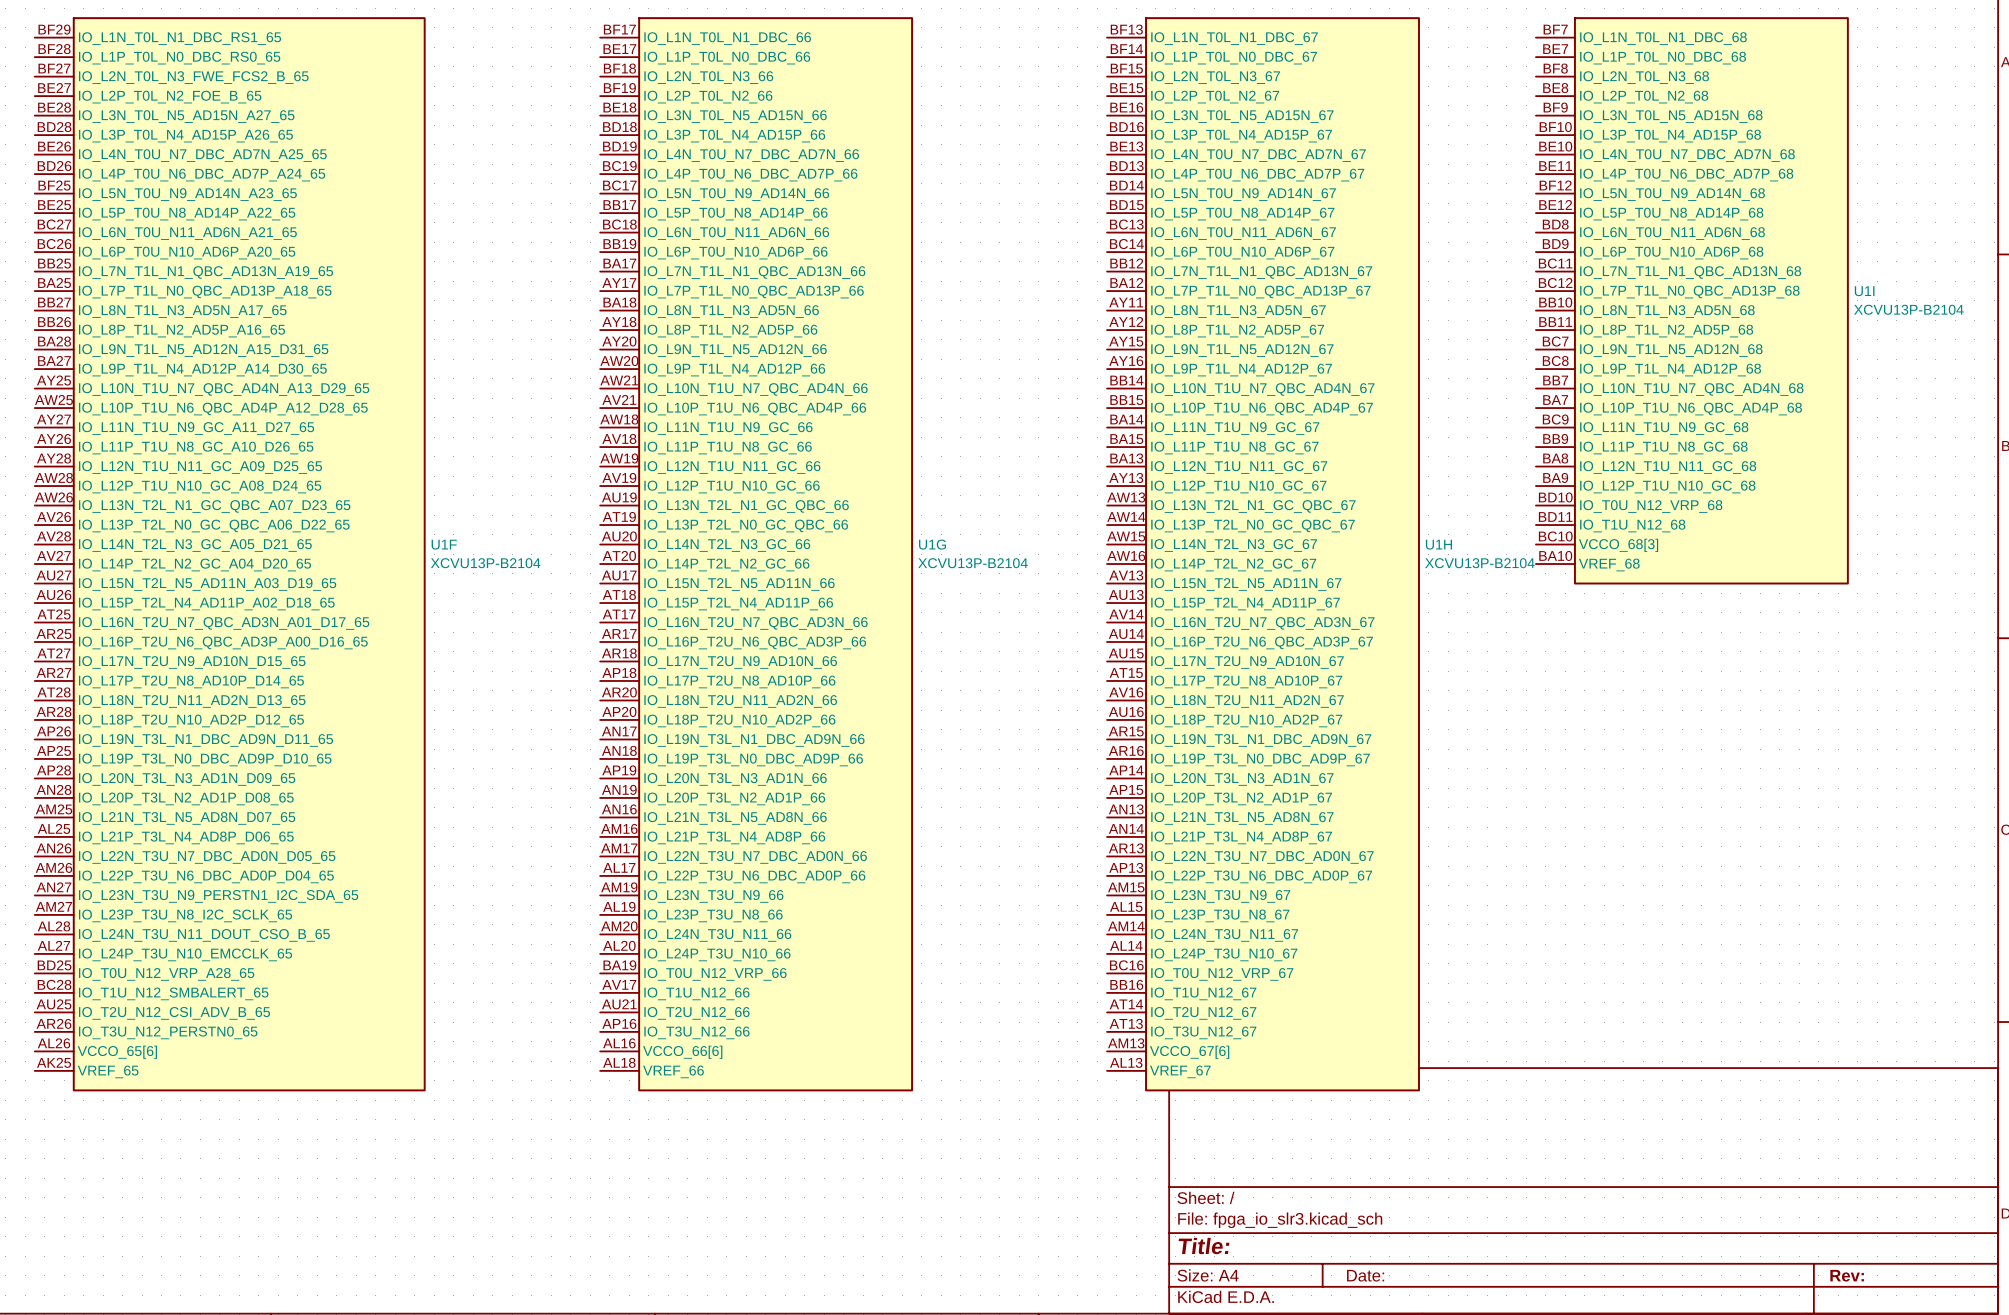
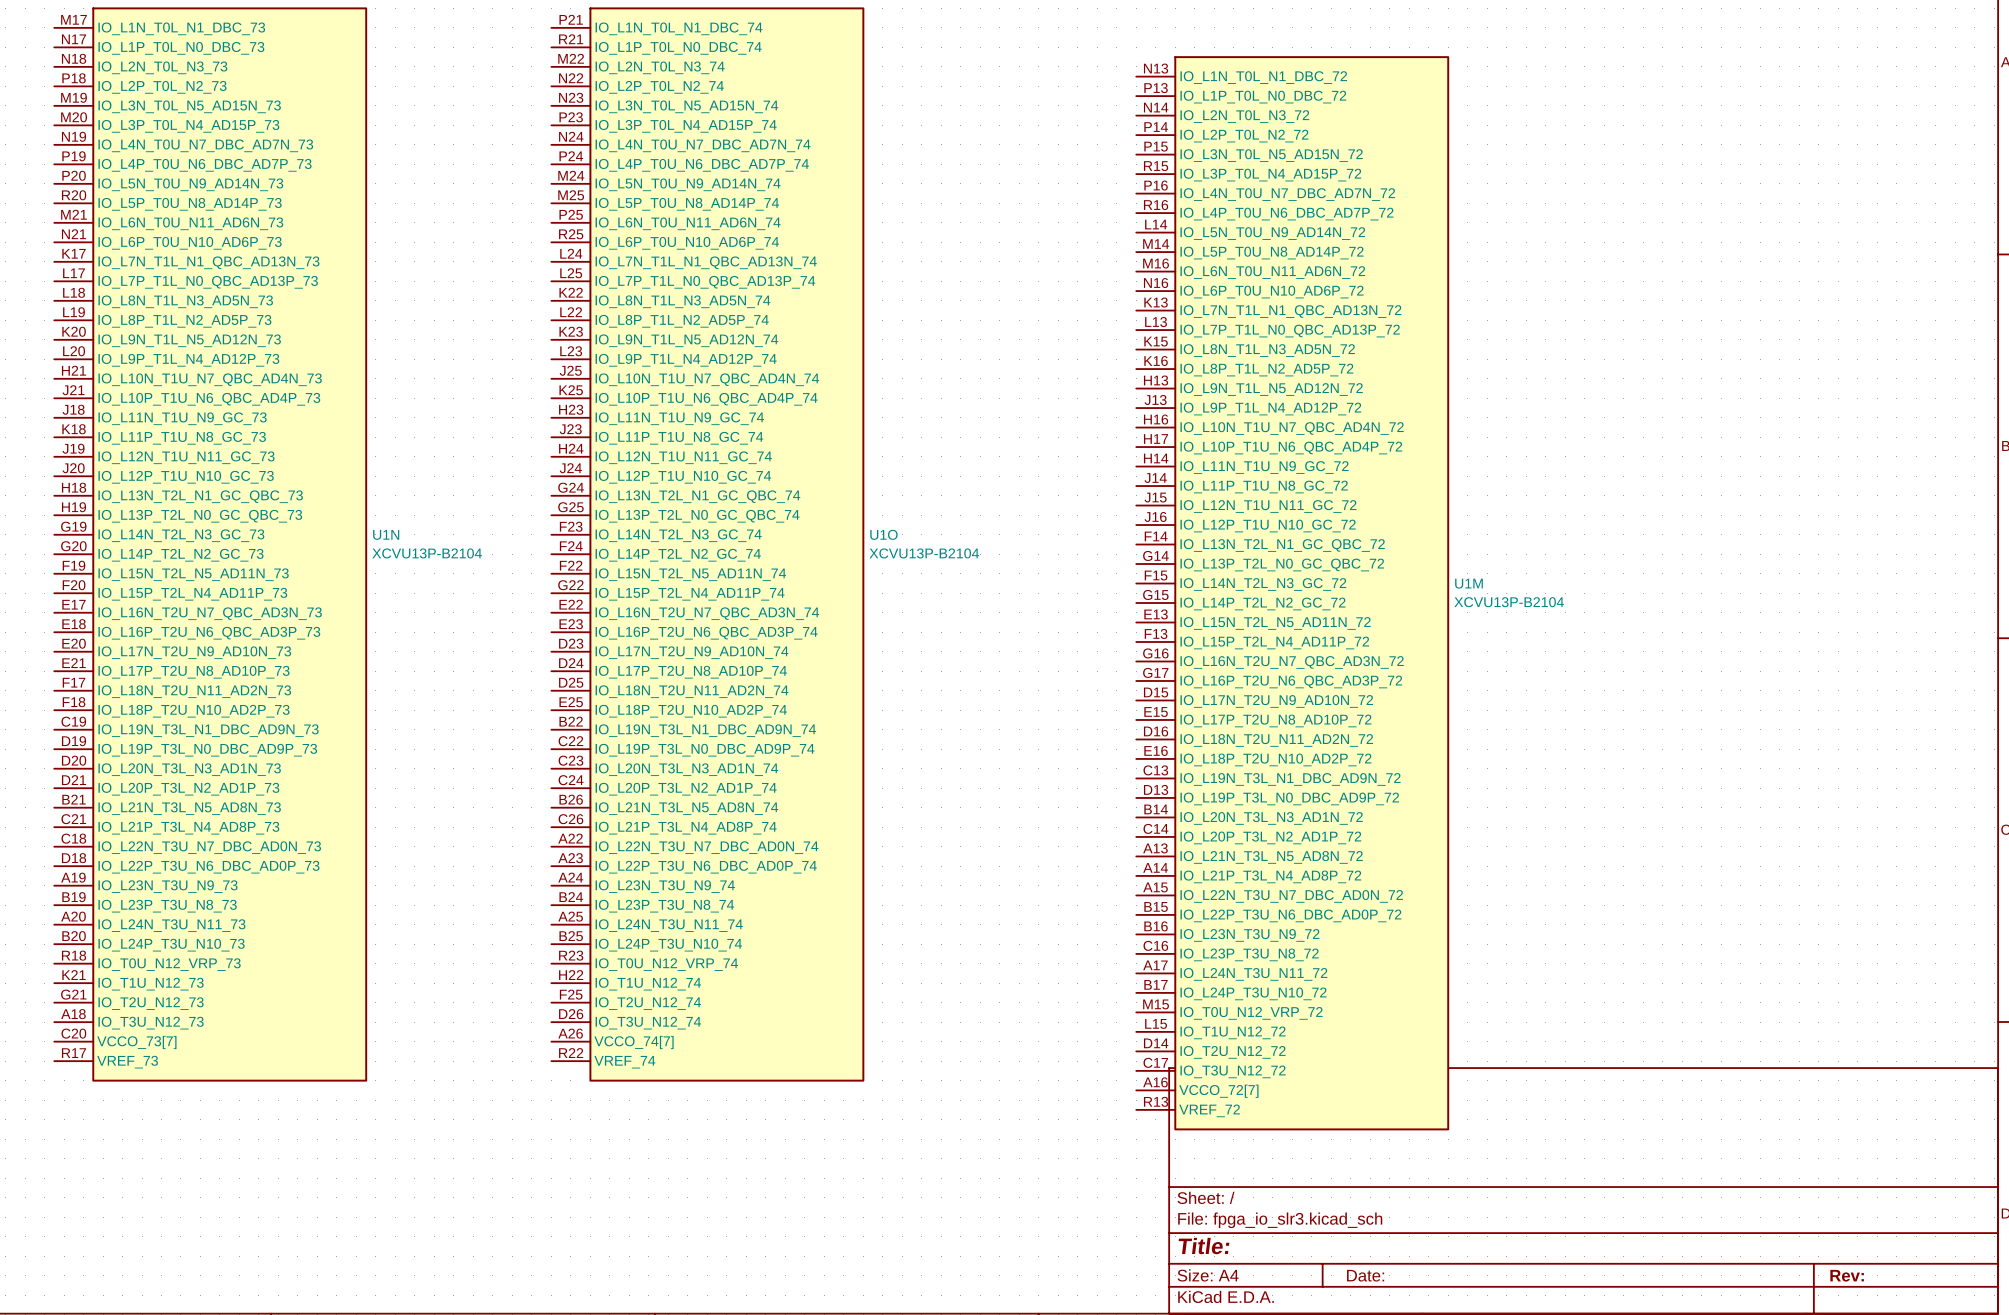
U1I: XCVU13P-B2104 (1692, 300) -> none
U1N: none -> XCVU13P-B2104 (210, 544)
U1O: none -> XCVU13P-B2104 (707, 544)
U1F: XCVU13P-B2104 (230, 554) -> none
U1G: XCVU13P-B2104 (756, 554) -> none
U1H: XCVU13P-B2104 (1263, 554) -> none
U1M: none -> XCVU13P-B2104 (1292, 593)

